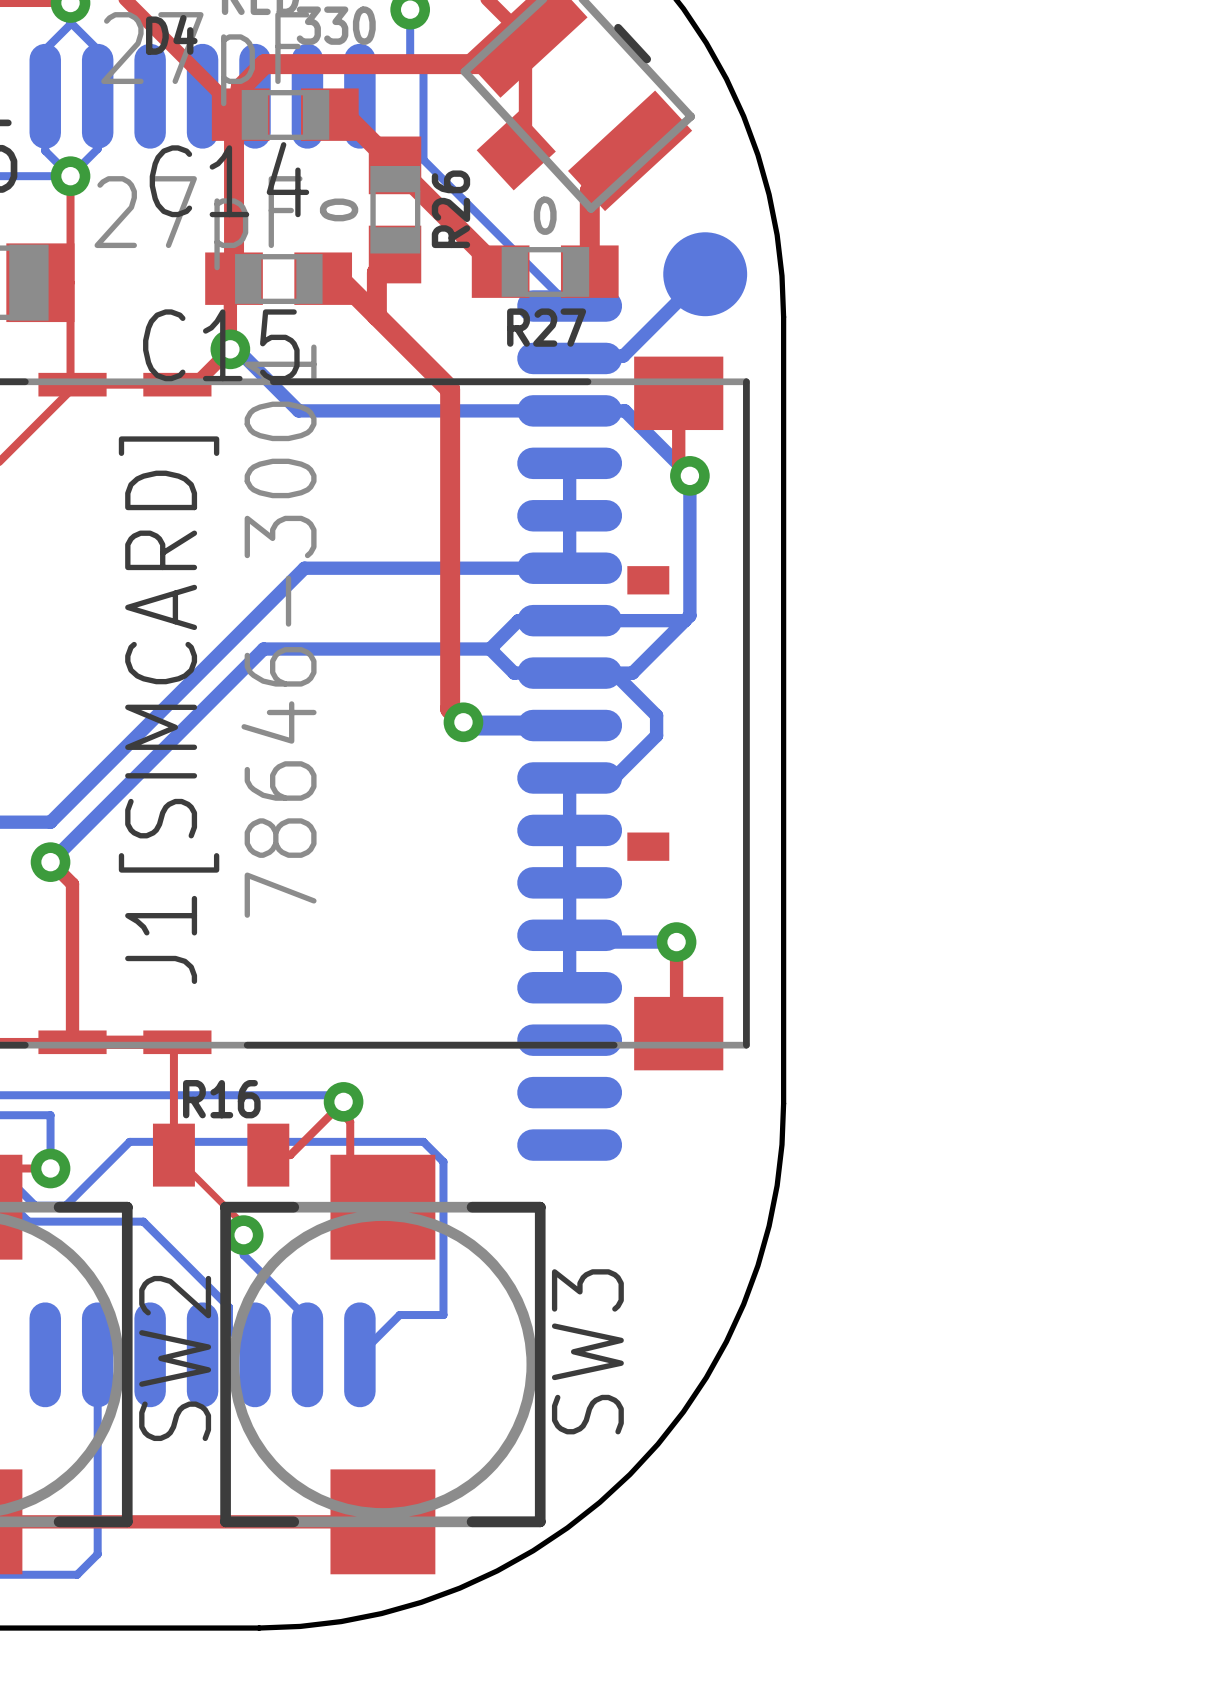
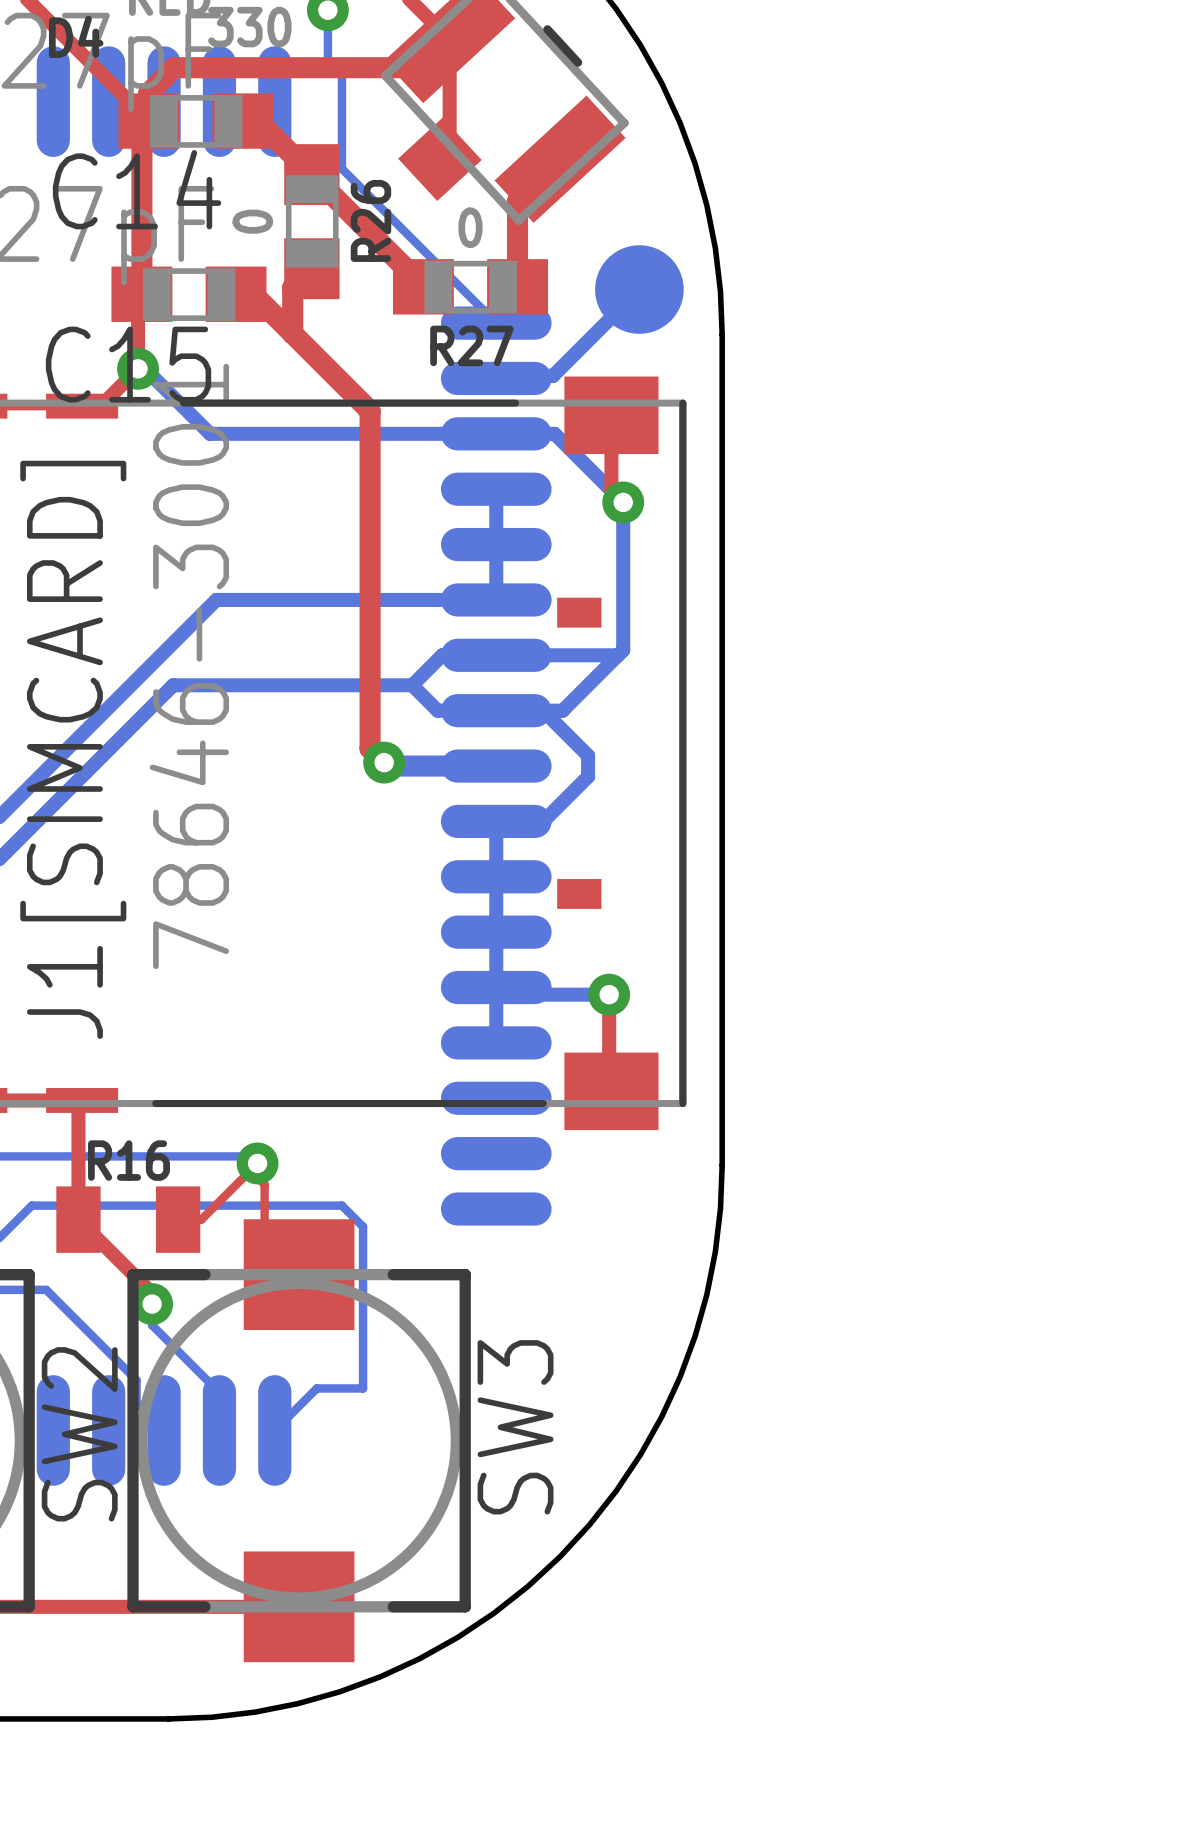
top track width: thin (173, 1045) (173, 1155) (243, 1224) (243, 1235) -> thick (78, 1104) (78, 1219) (152, 1293) (152, 1304)

